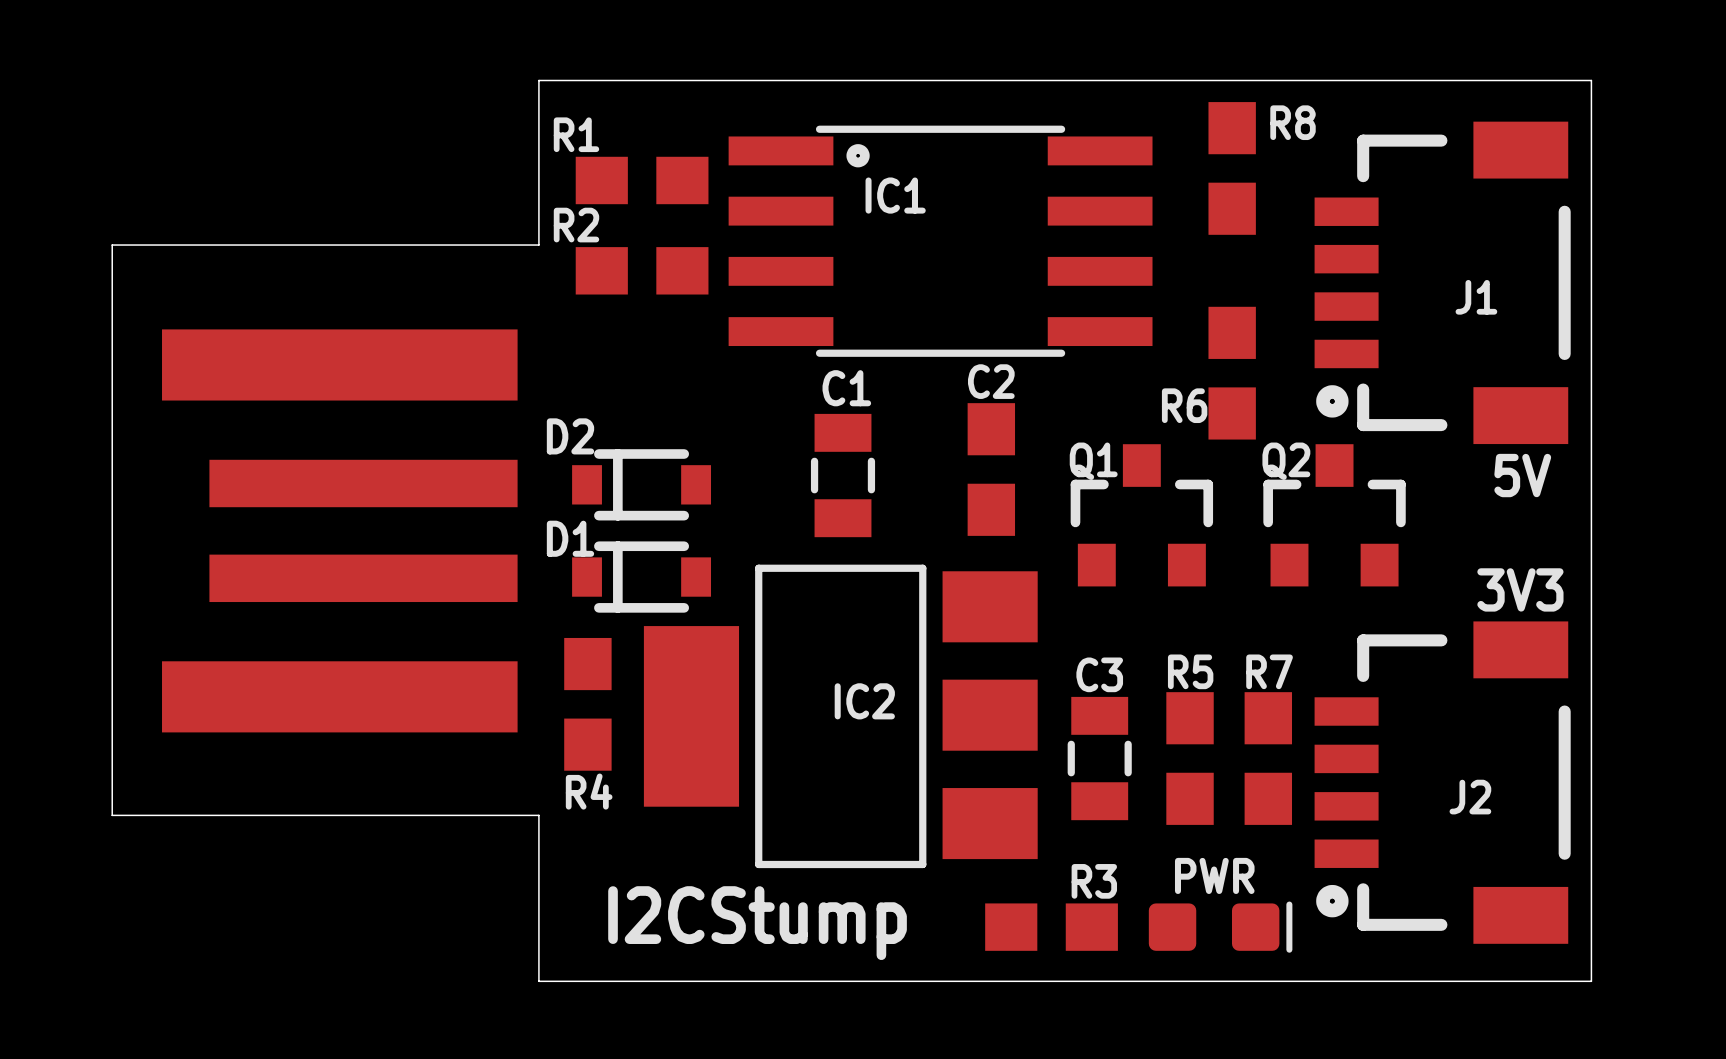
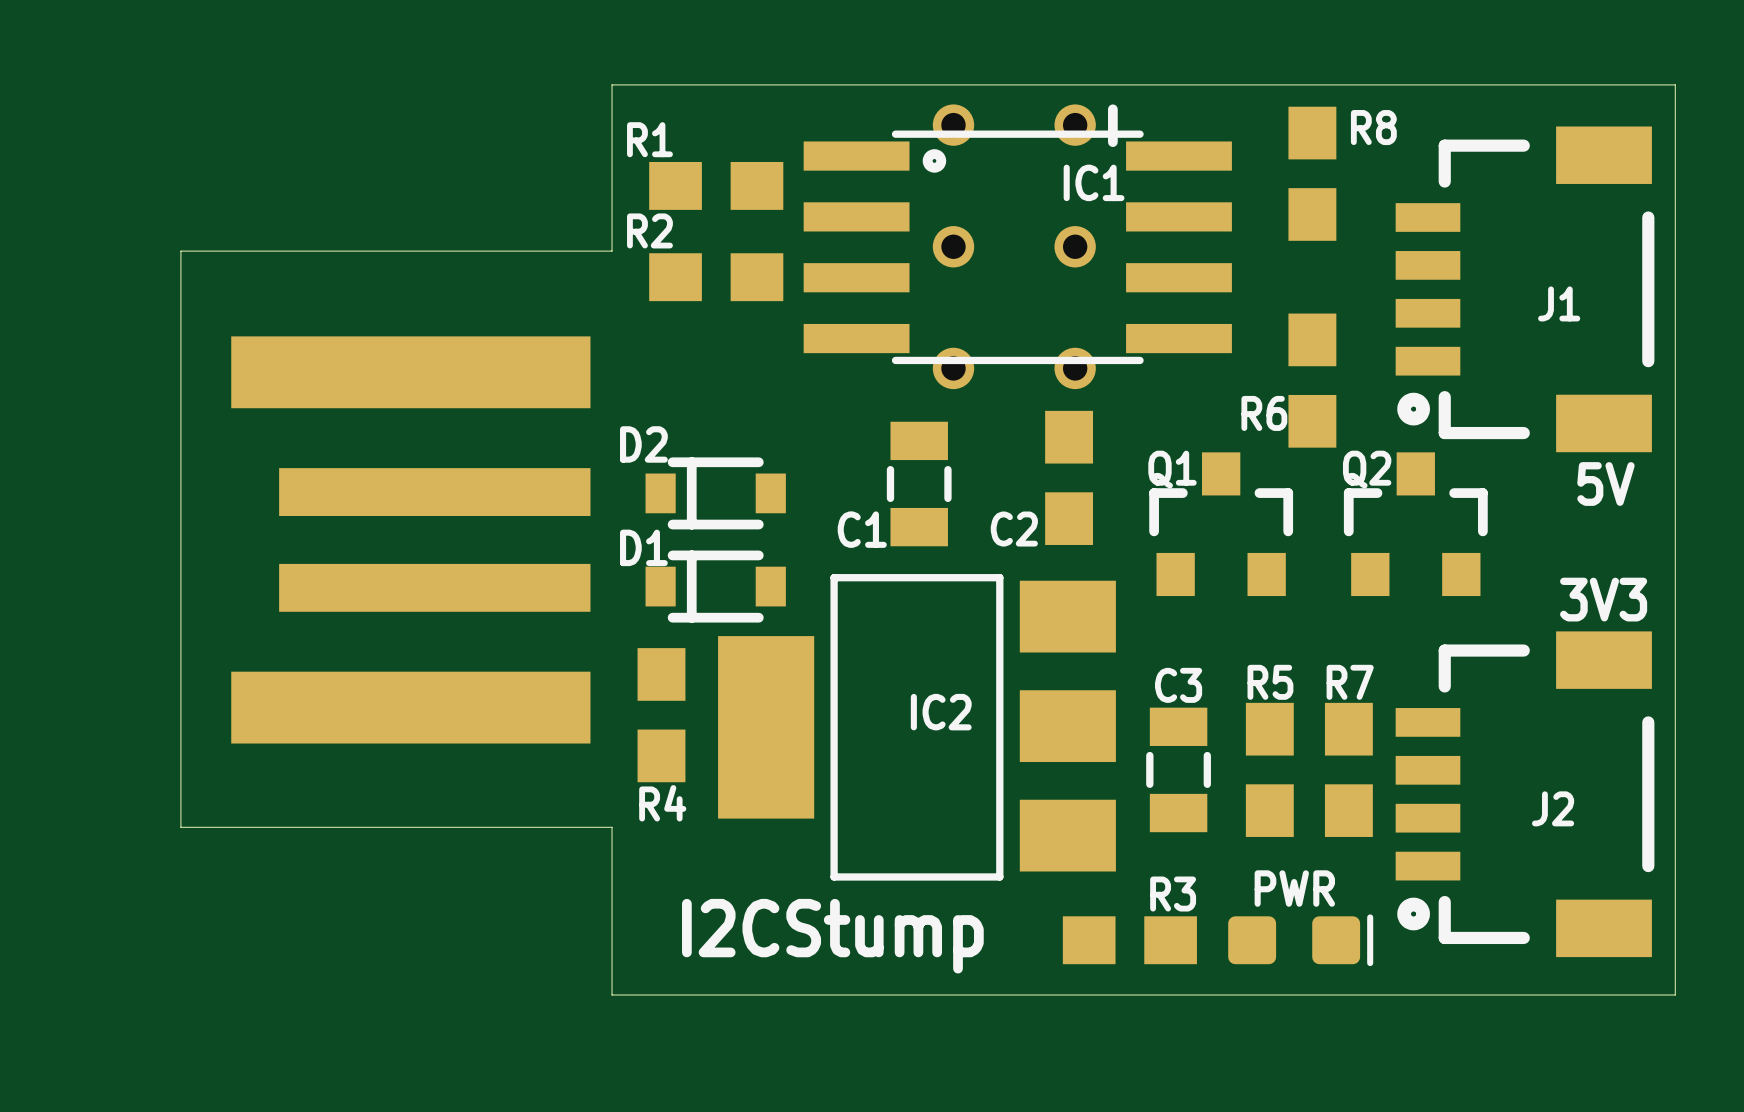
text position: IC1 (895, 195) -> IC1 (1094, 182)
part: none -> (1025, 246)
C2 name position: C2 (991, 381) -> C2 (1014, 529)
text position: C1 (846, 388) -> C1 (862, 529)

